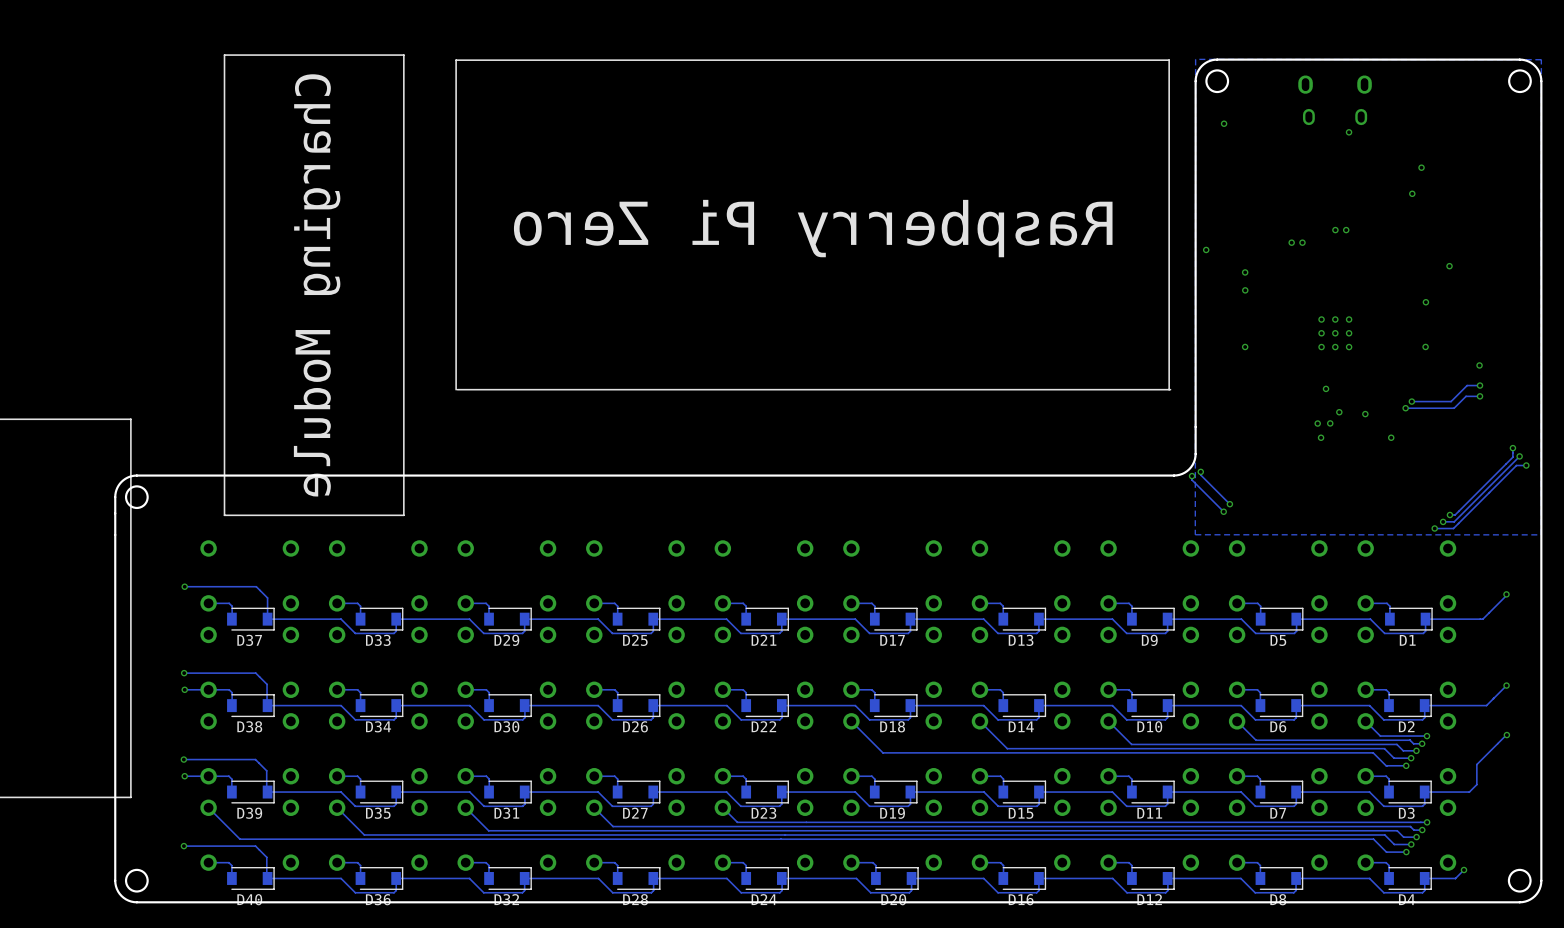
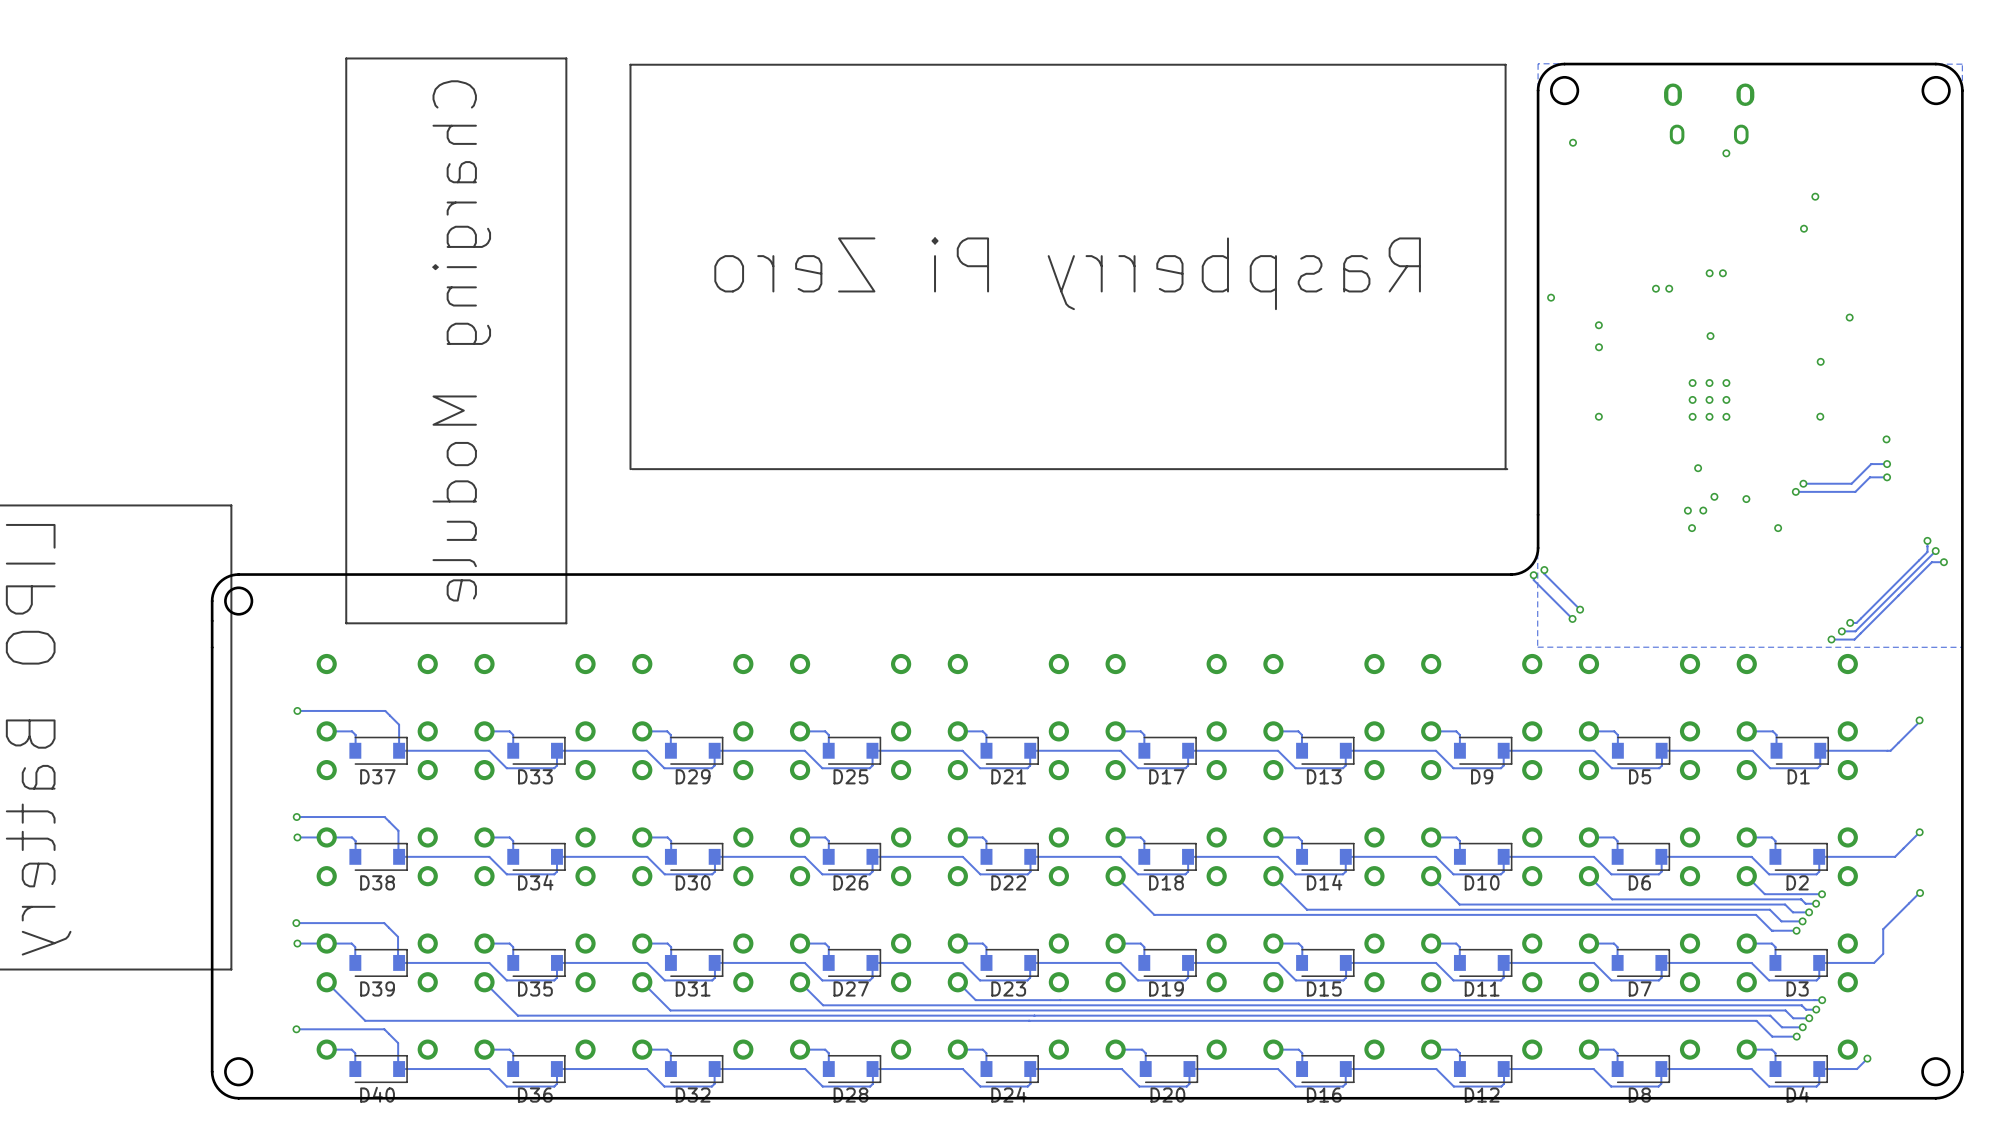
via: none -> (1710, 336)

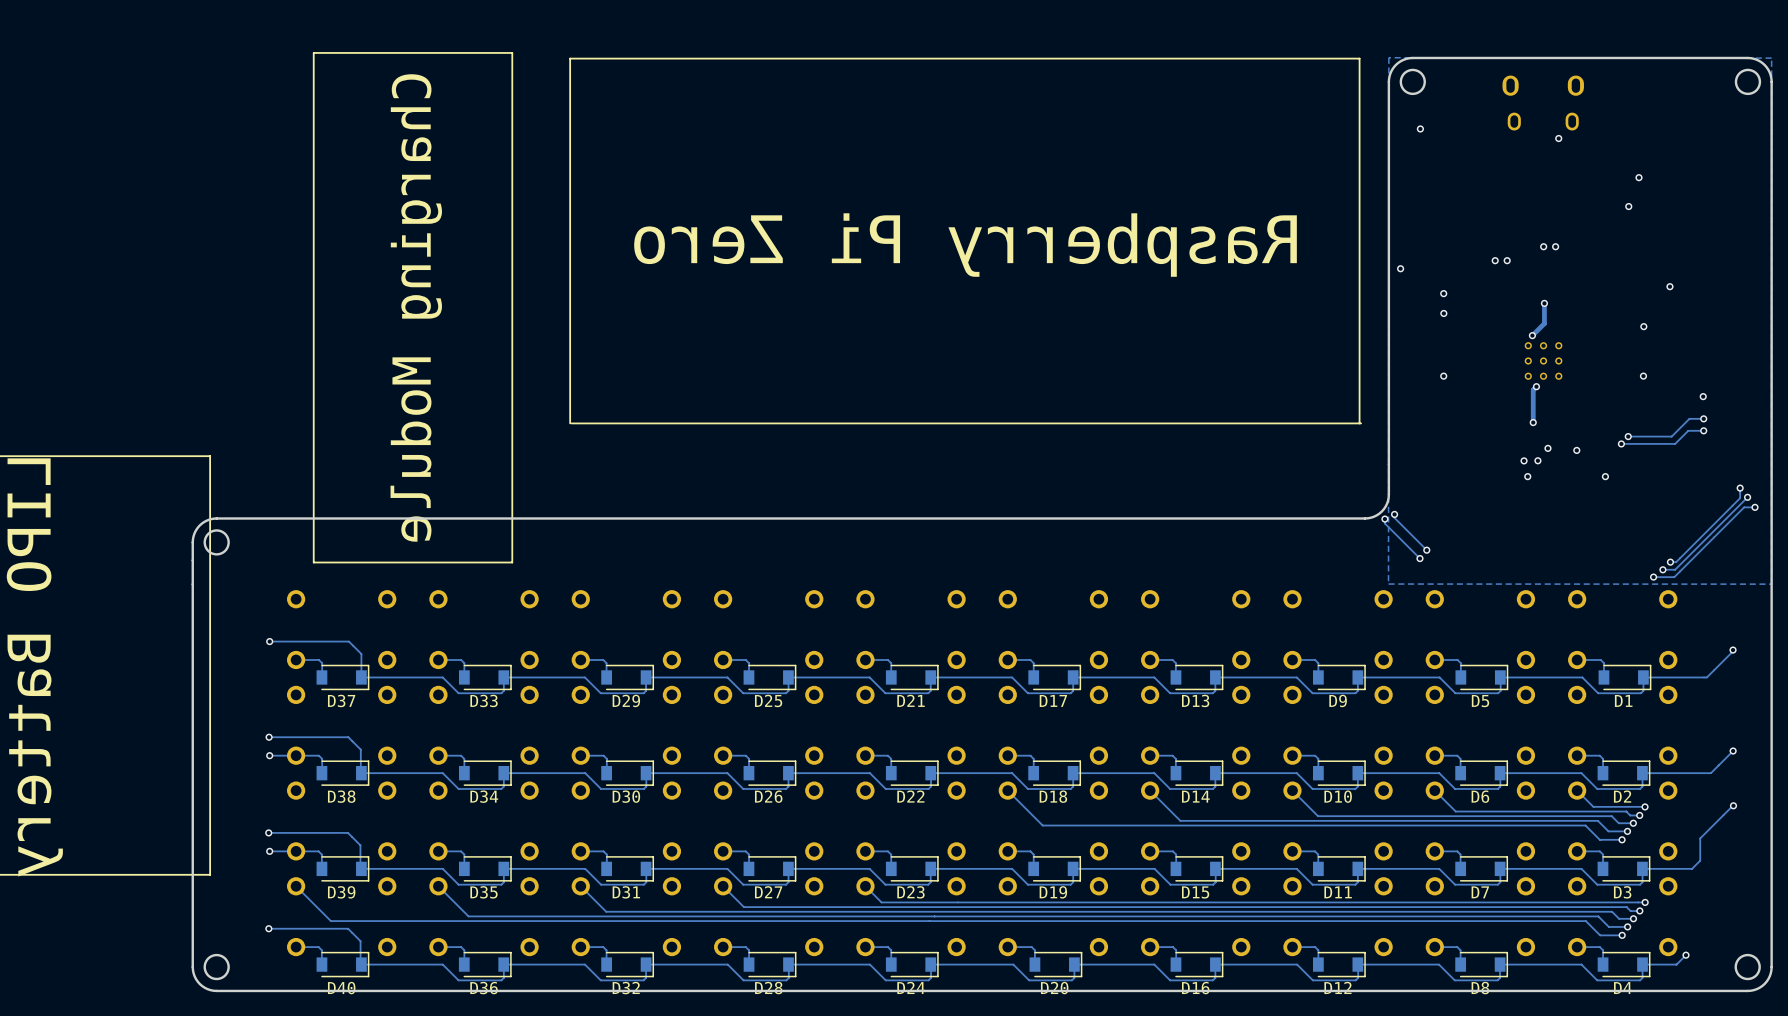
track: none -> (1544, 303) (1544, 323) (1532, 335)
via: none -> (1532, 335)
track: none -> (1536, 386) (1533, 389) (1533, 422)
via: none -> (1536, 386)

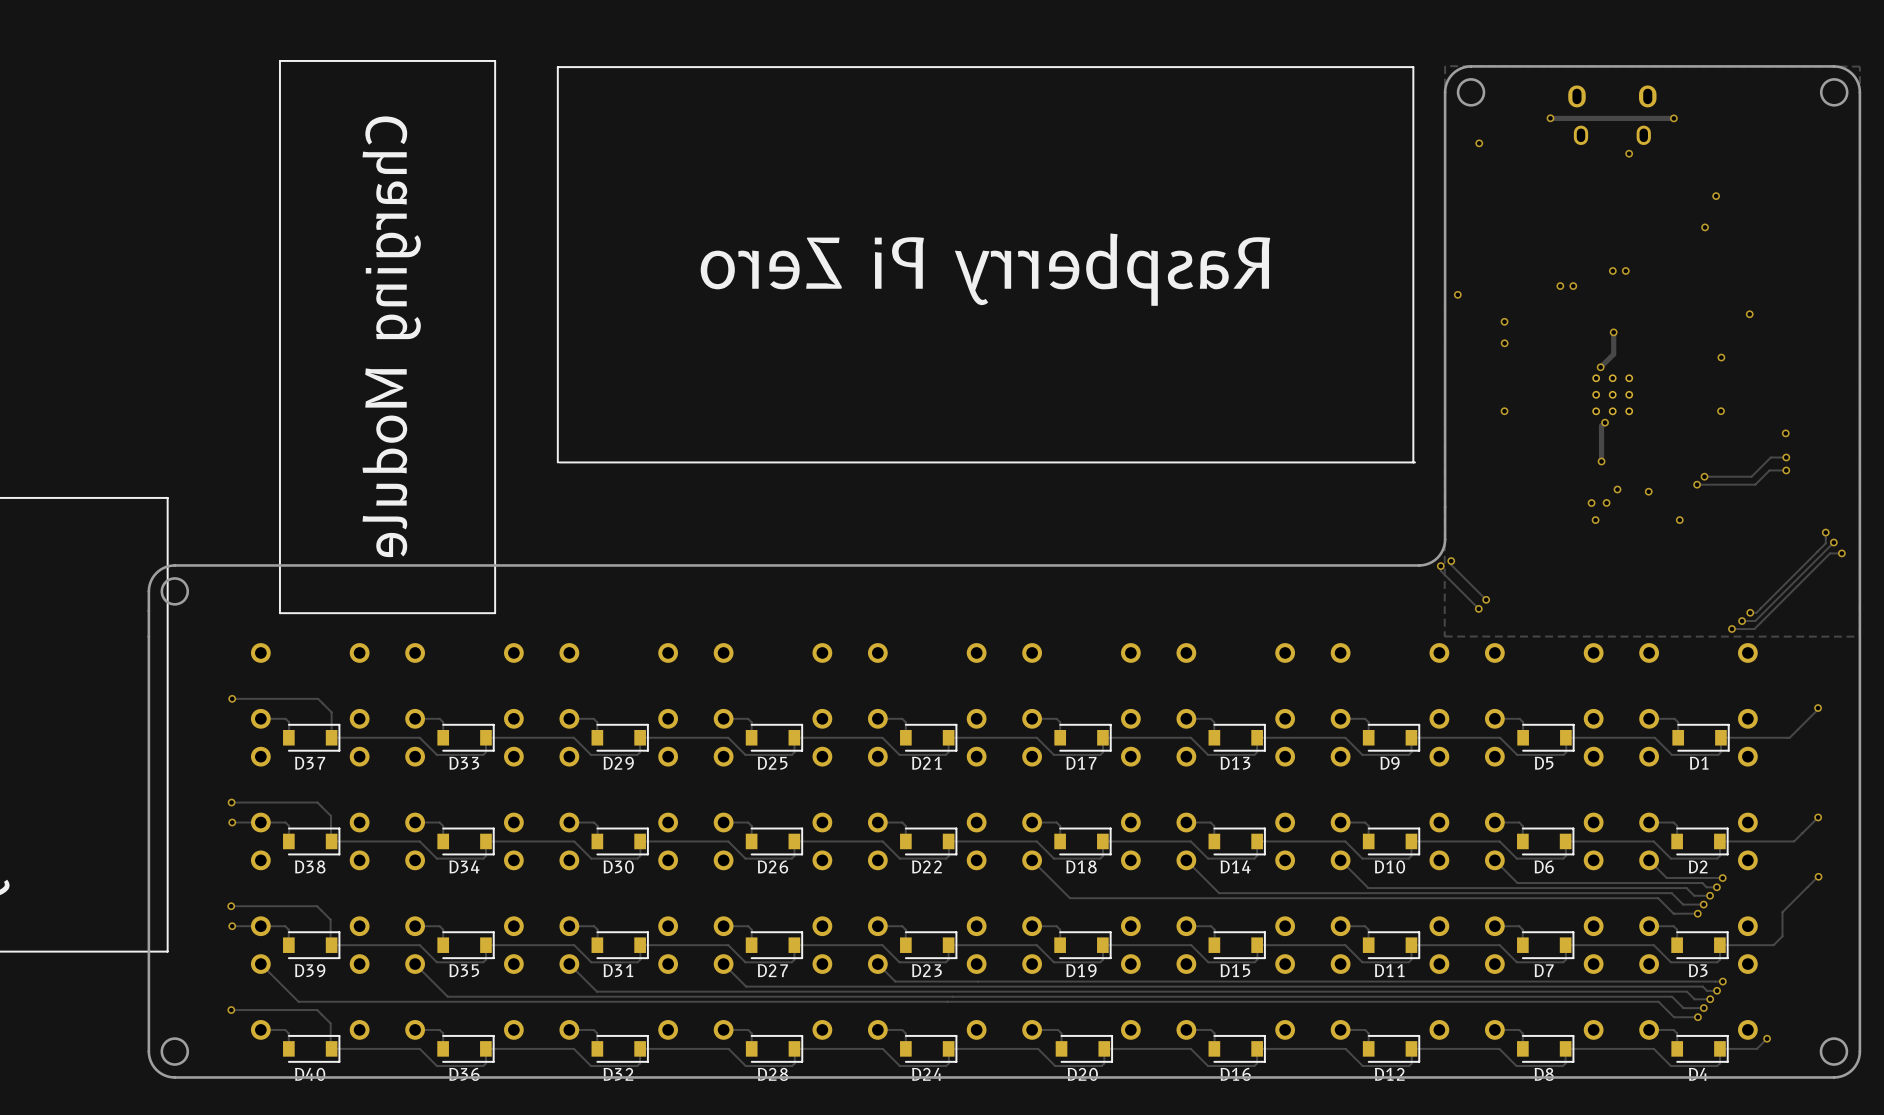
via: none -> (1550, 118)
track: none -> (1673, 118) (1550, 118)
via: none -> (1673, 118)

